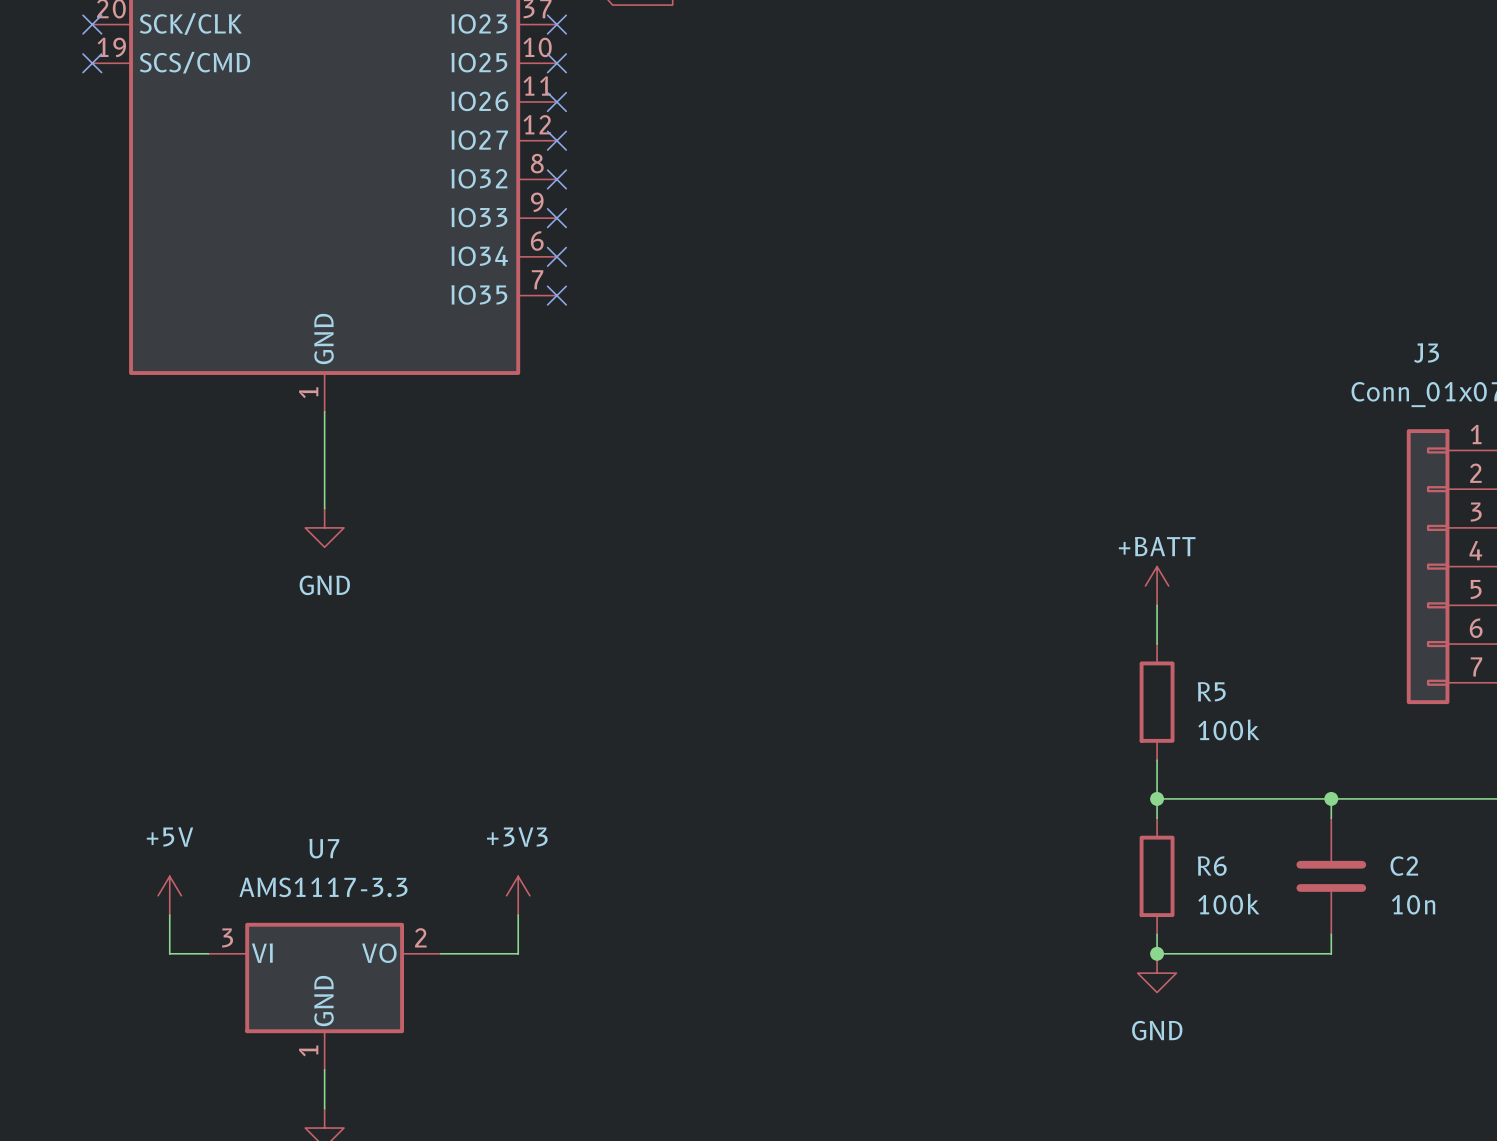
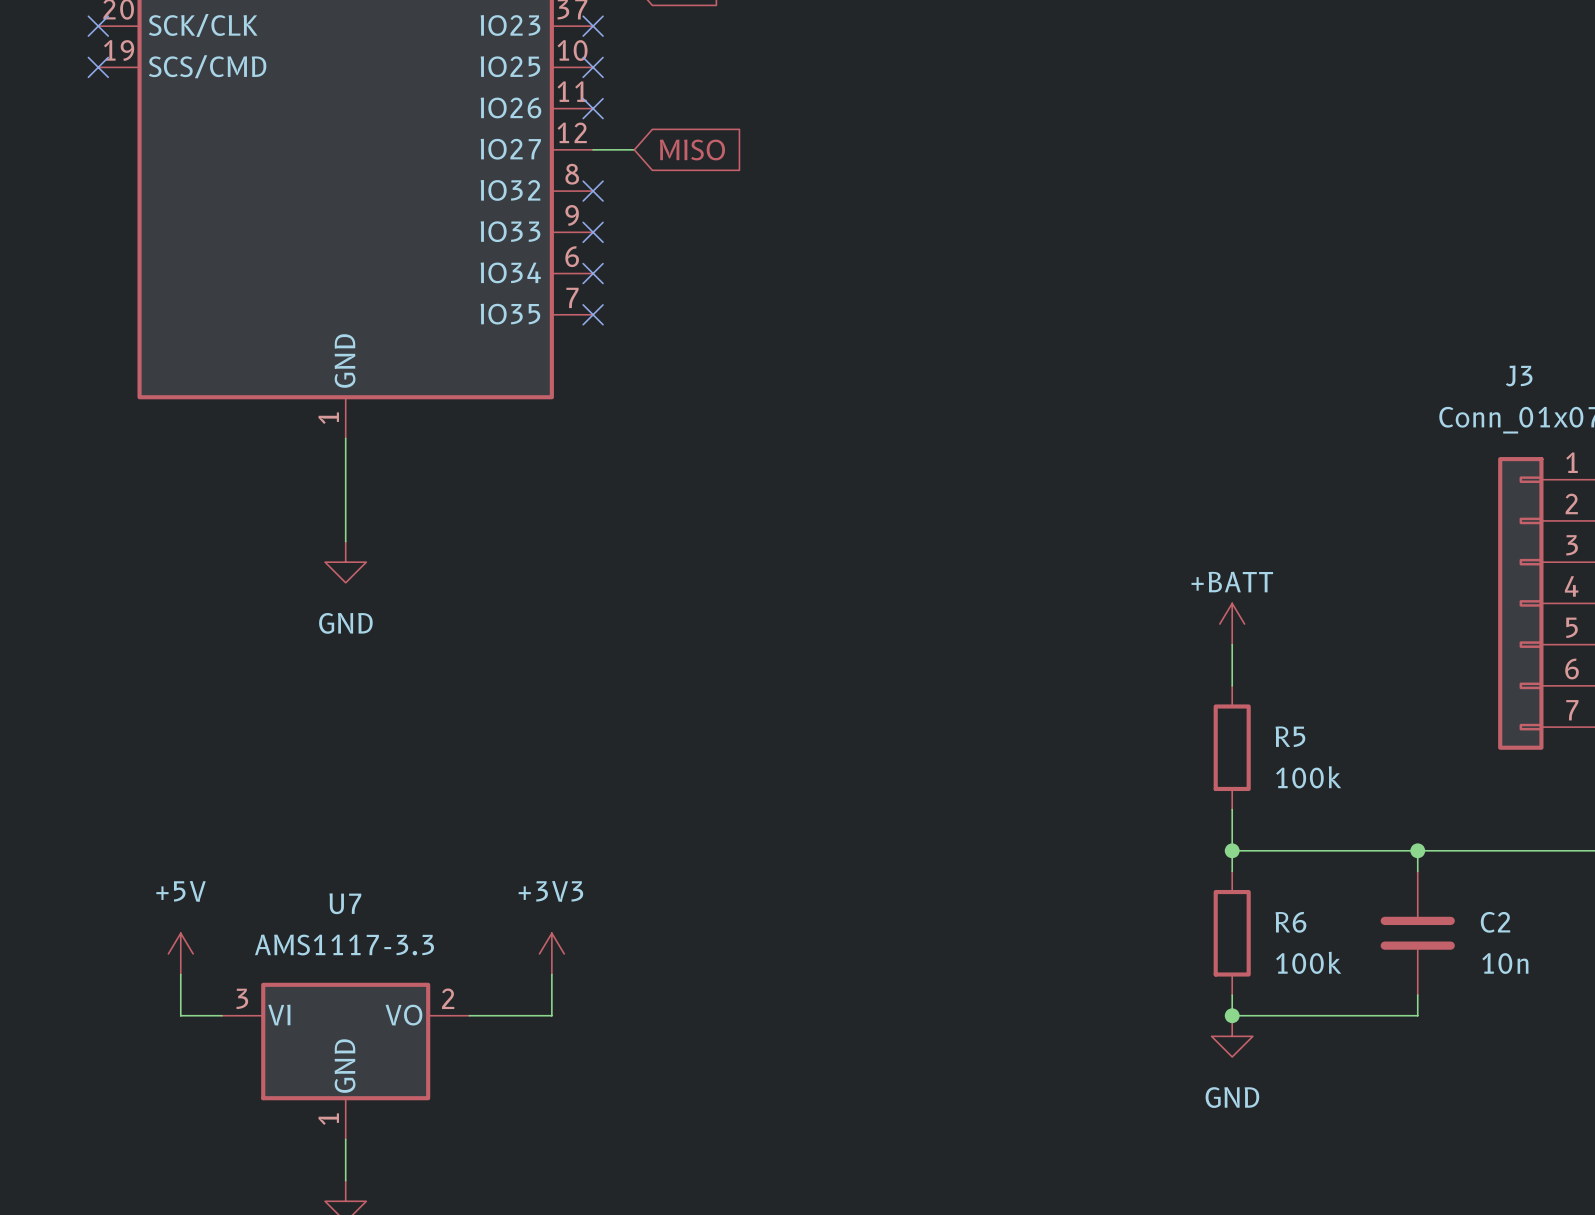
wire: none -> (593, 149) (634, 149)
no-connect mark: (556, 140) -> none
global label: none -> MISO (692, 149)

